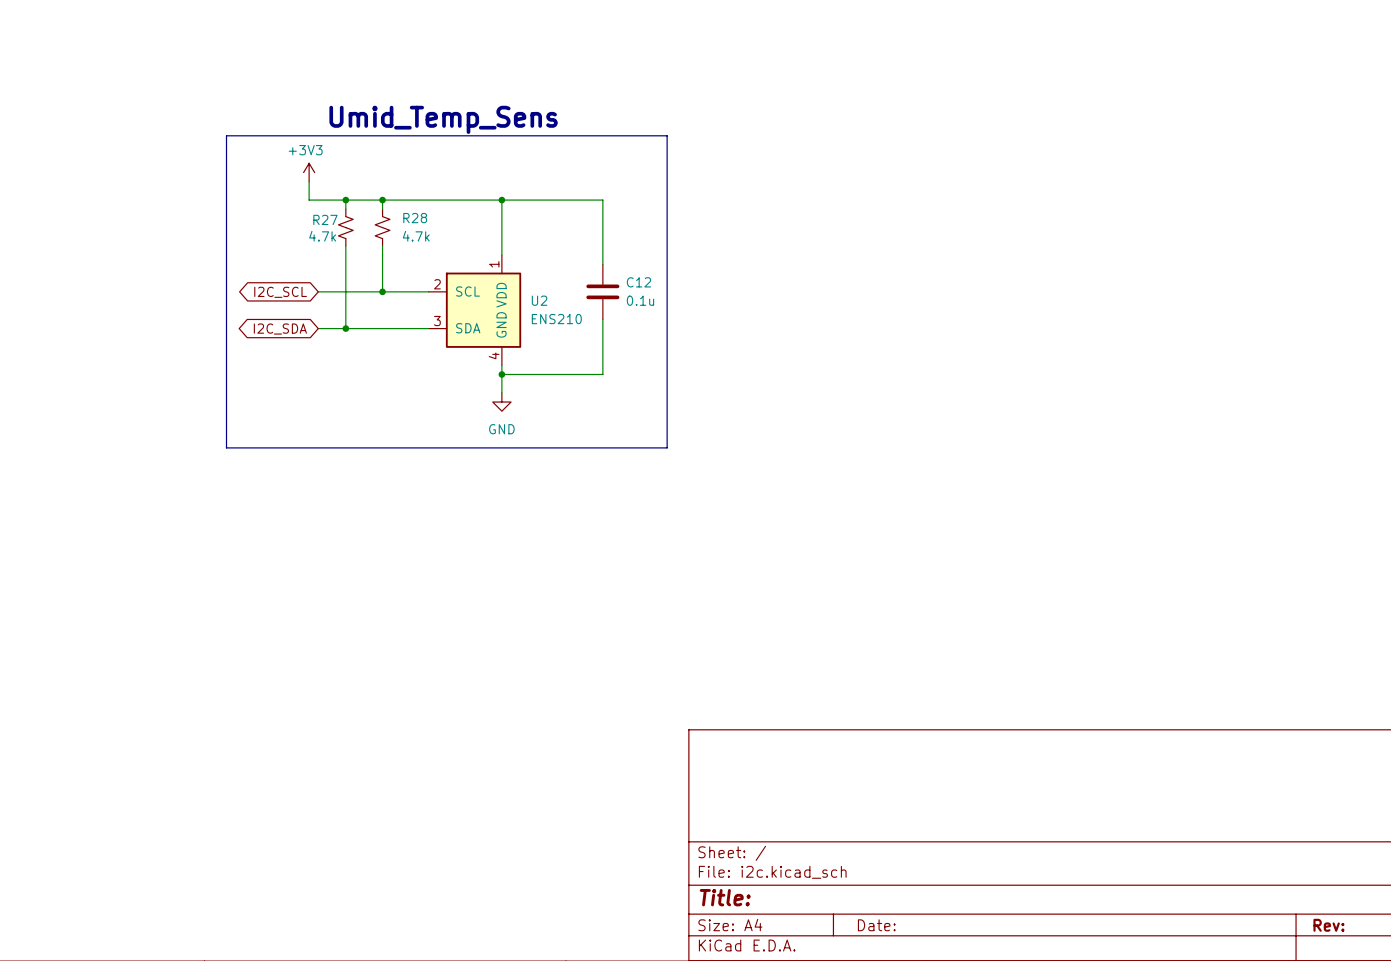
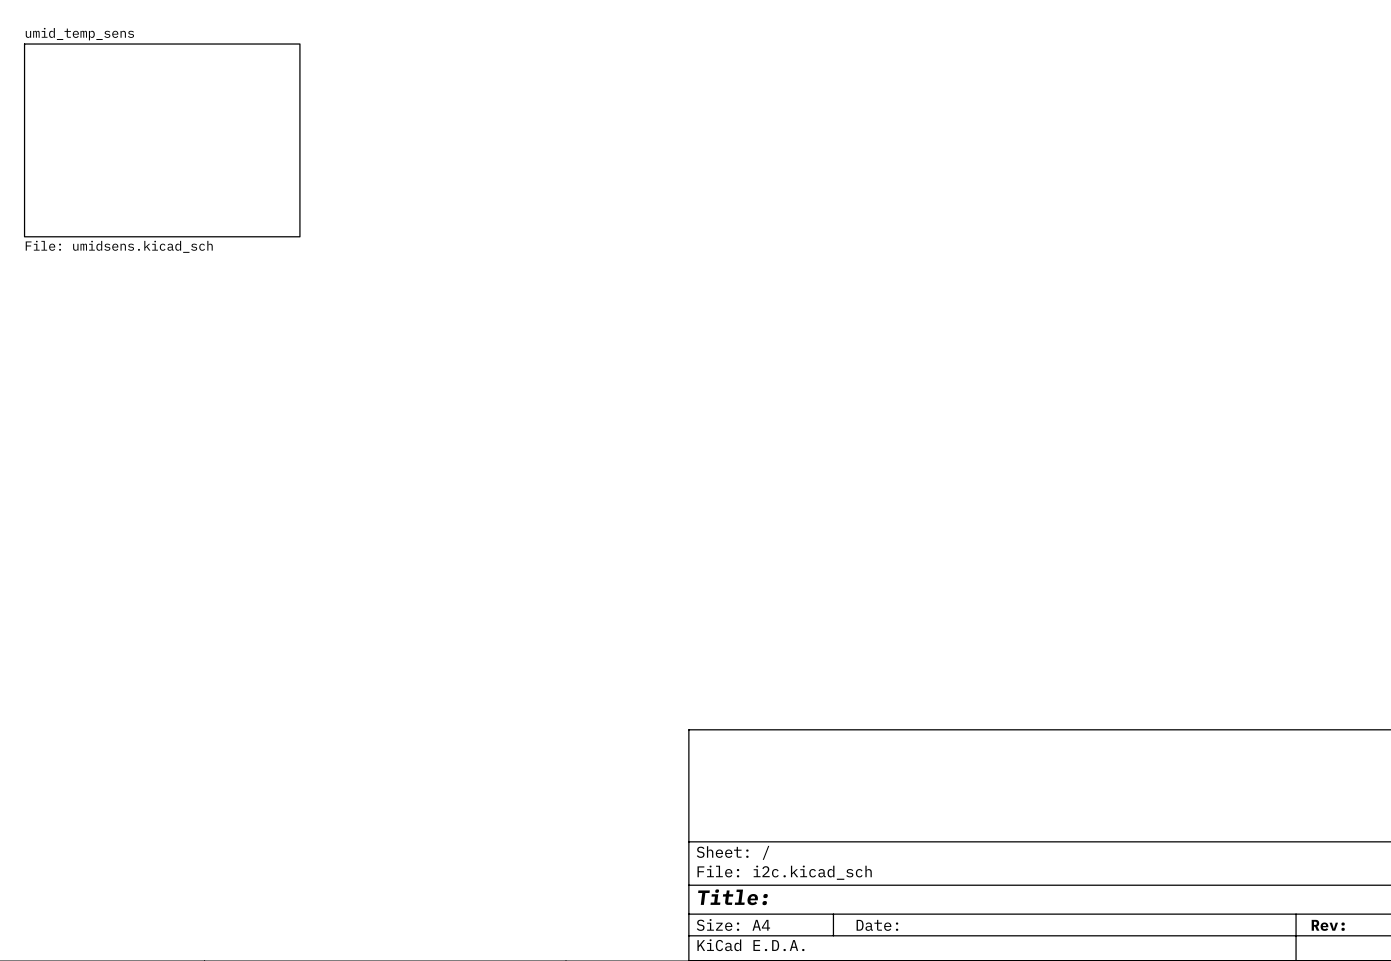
text: Umid_Temp_Sens (443, 119) -> none
line: (226, 135) (667, 135) (667, 447) (226, 447) (226, 135) -> none
sheet umid_temp_sens: none -> File: umidsens.kicad_sch (162, 140)
power symbol: +3V3 (309, 172) -> none
wire: (309, 181) (309, 200) (602, 200) (602, 264) -> none
wire: (345, 200) (345, 209) -> none
junction: (345, 200) -> none
wire: (382, 200) (382, 209) -> none
junction: (382, 200) -> none
wire: (501, 200) (501, 255) -> none
junction: (501, 200) -> none
R27: 4.7k (345, 227) -> none
R28: 4.7k (382, 227) -> none
wire: (345, 245) (345, 328) -> none
wire: (382, 245) (382, 291) -> none
wire: (318, 291) (428, 291) -> none
junction: (382, 291) -> none
C12: 0.1u (602, 291) -> none
global label: I2C_SCL (280, 292) -> none
U2: ENS210 (474, 310) -> none
wire: (602, 319) (602, 374) (501, 374) -> none
wire: (318, 328) (428, 328) -> none
junction: (345, 328) -> none
global label: I2C_SDA (280, 329) -> none
wire: (501, 365) (501, 392) -> none
junction: (501, 374) -> none
power symbol: GND (501, 402) -> none

